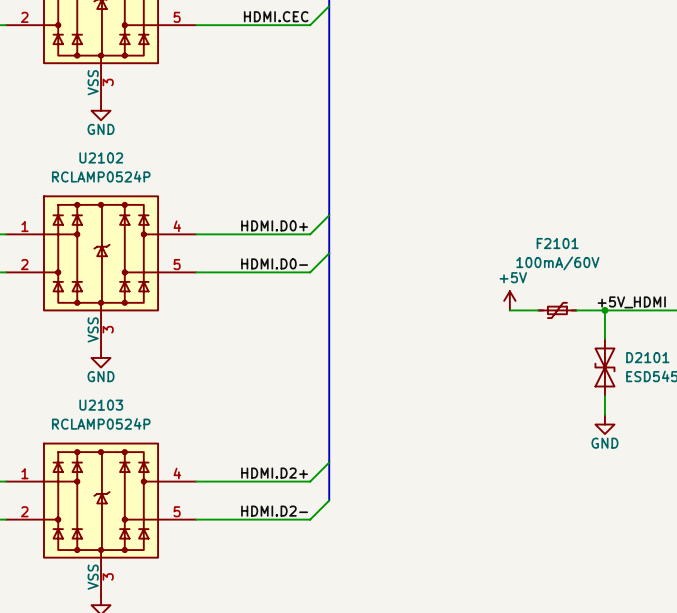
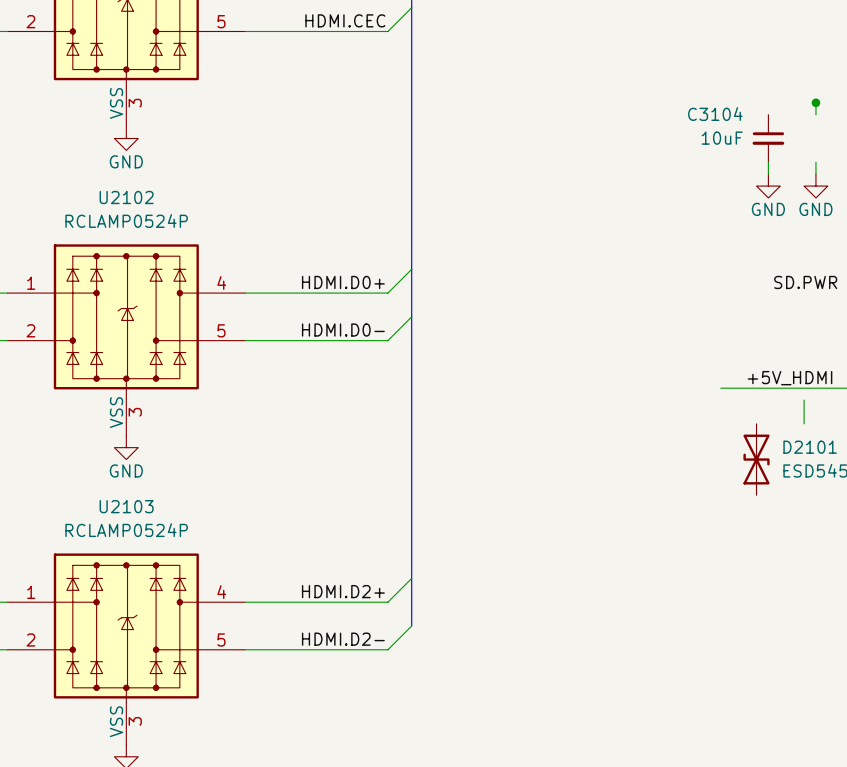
wire: none -> (815, 102) (815, 114)
junction: none -> (815, 102)
C3104: none -> 10uF (768, 138)
wire: none -> (768, 162) (768, 174)
wire: none -> (815, 162) (815, 174)
power symbol: none -> GND (768, 186)
power symbol: none -> GND (815, 186)
label: none -> SD.PWR (805, 282)
power symbol: +5V (509, 300) -> none
wire: (509, 310) (538, 310) -> none
F2101: 100mA/60V (557, 310) -> none
wire: (604, 310) (604, 338) -> none
junction: (604, 310) -> none
wire: (604, 396) (604, 415) -> (804, 400) (804, 423)
power symbol: GND (604, 424) -> none

